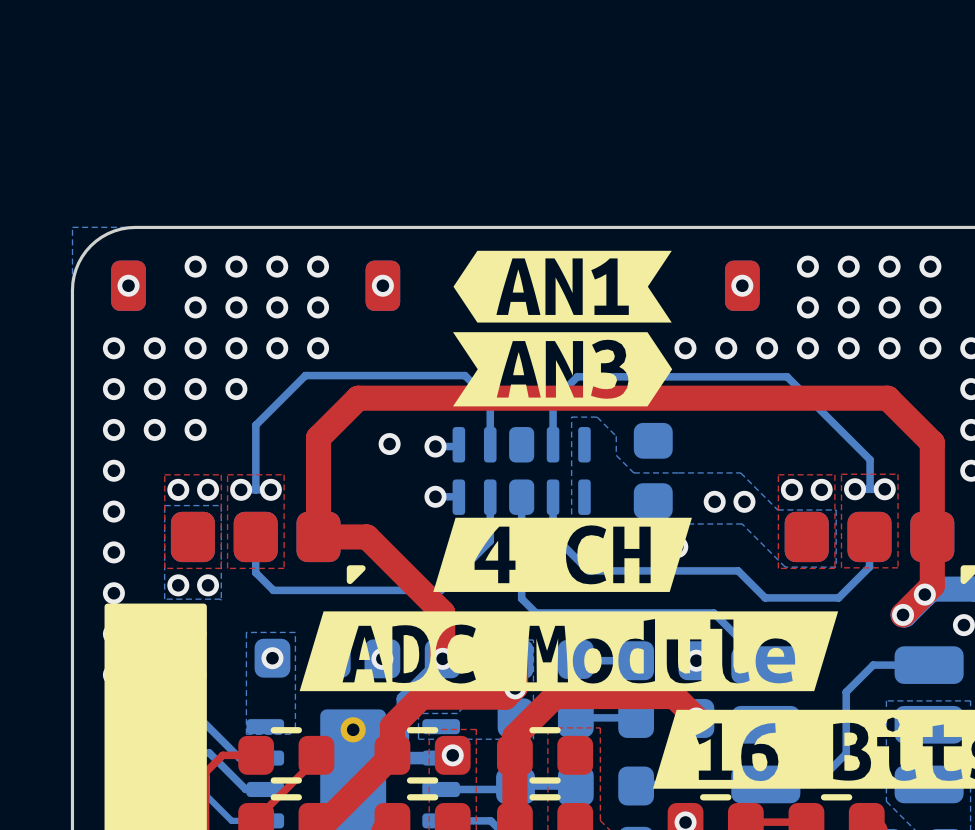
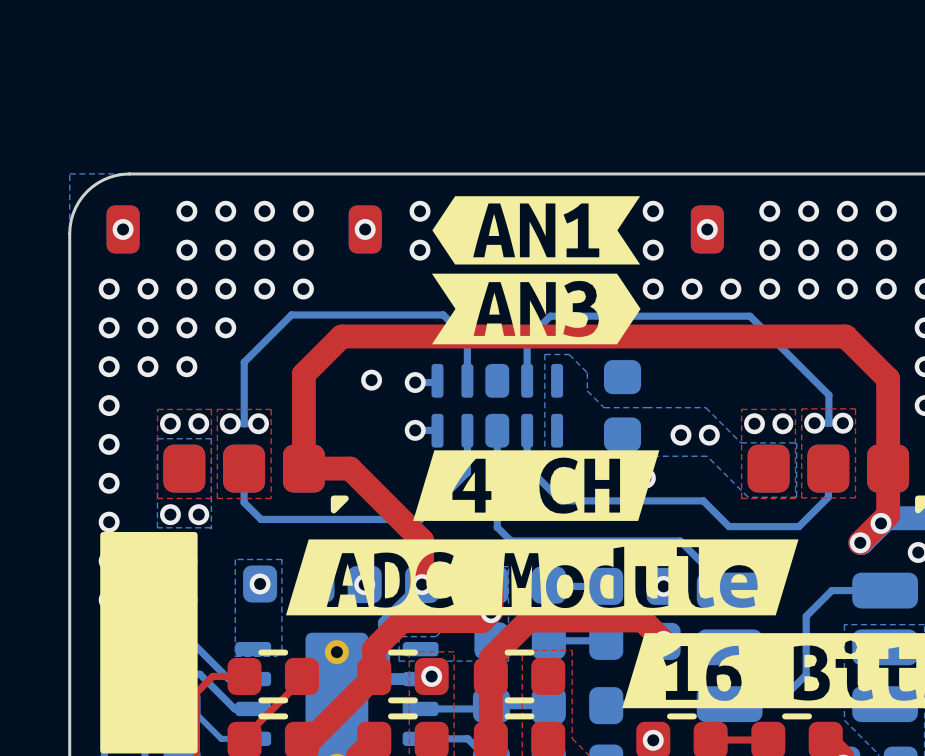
via: none -> (420, 211)
via: none -> (653, 211)
via: none -> (420, 250)
via: none -> (653, 250)

